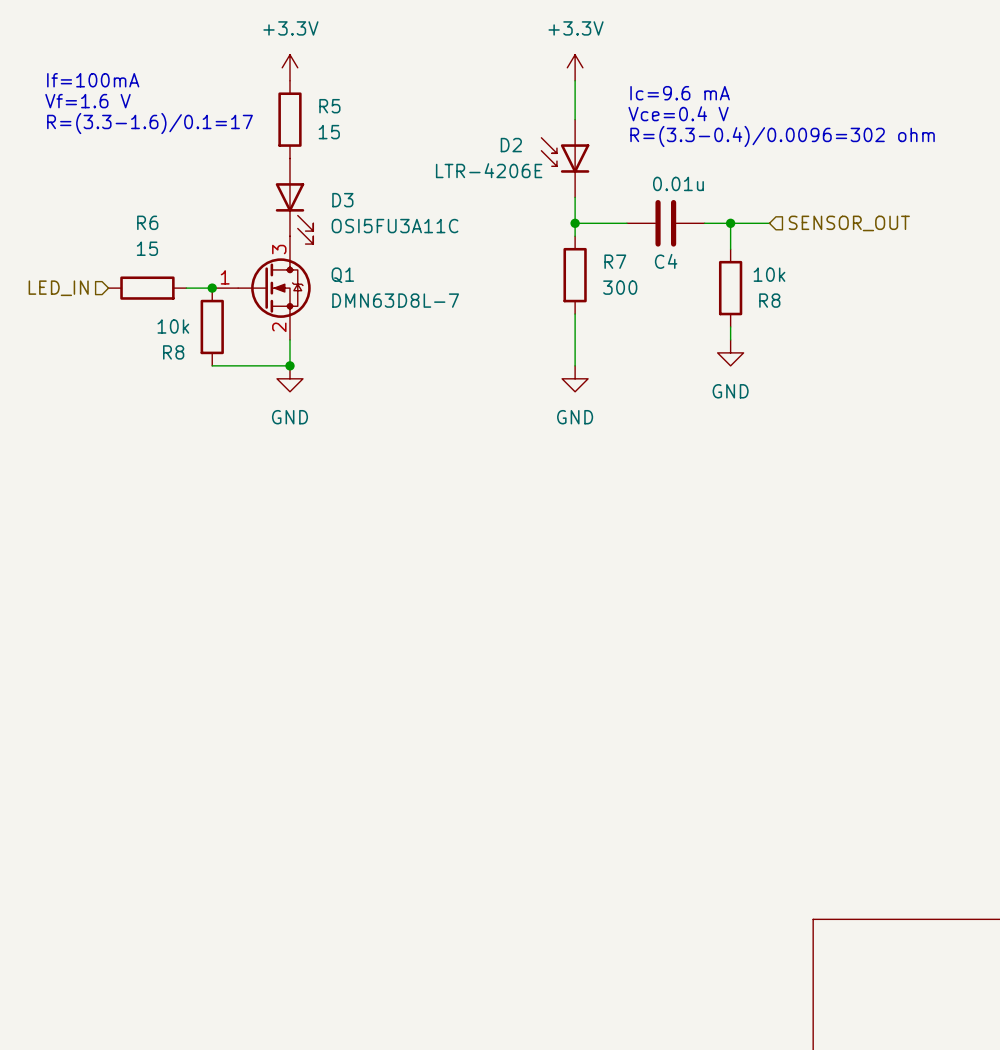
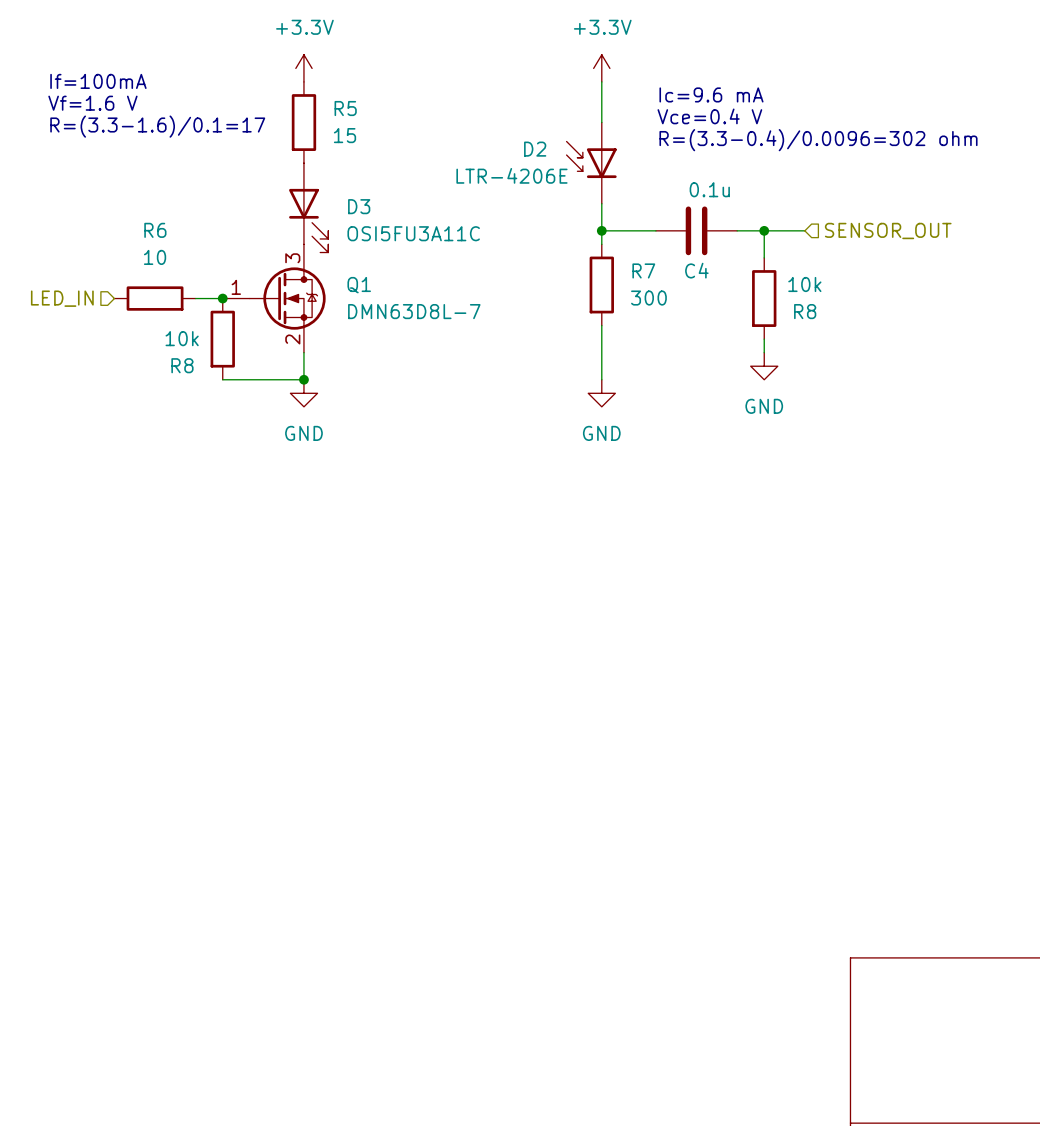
C4 value: 0.01u (678, 183) -> 0.1u (709, 189)
R6 value: 15 (147, 248) -> 10 (155, 257)

